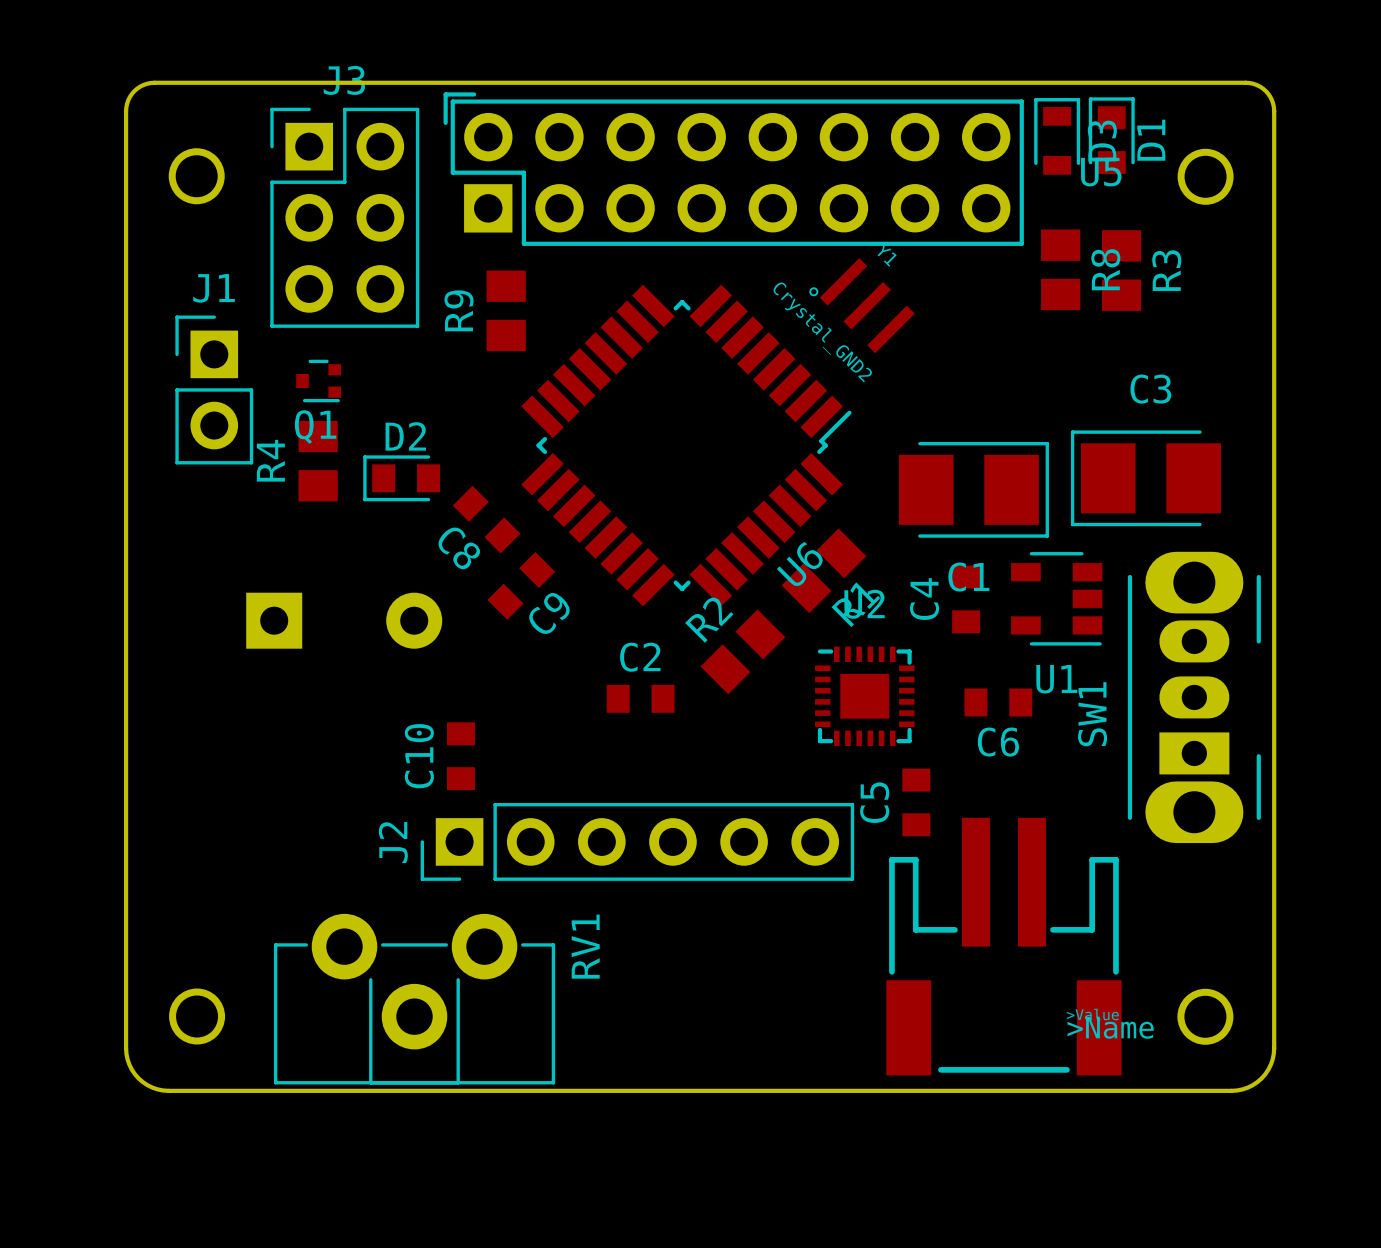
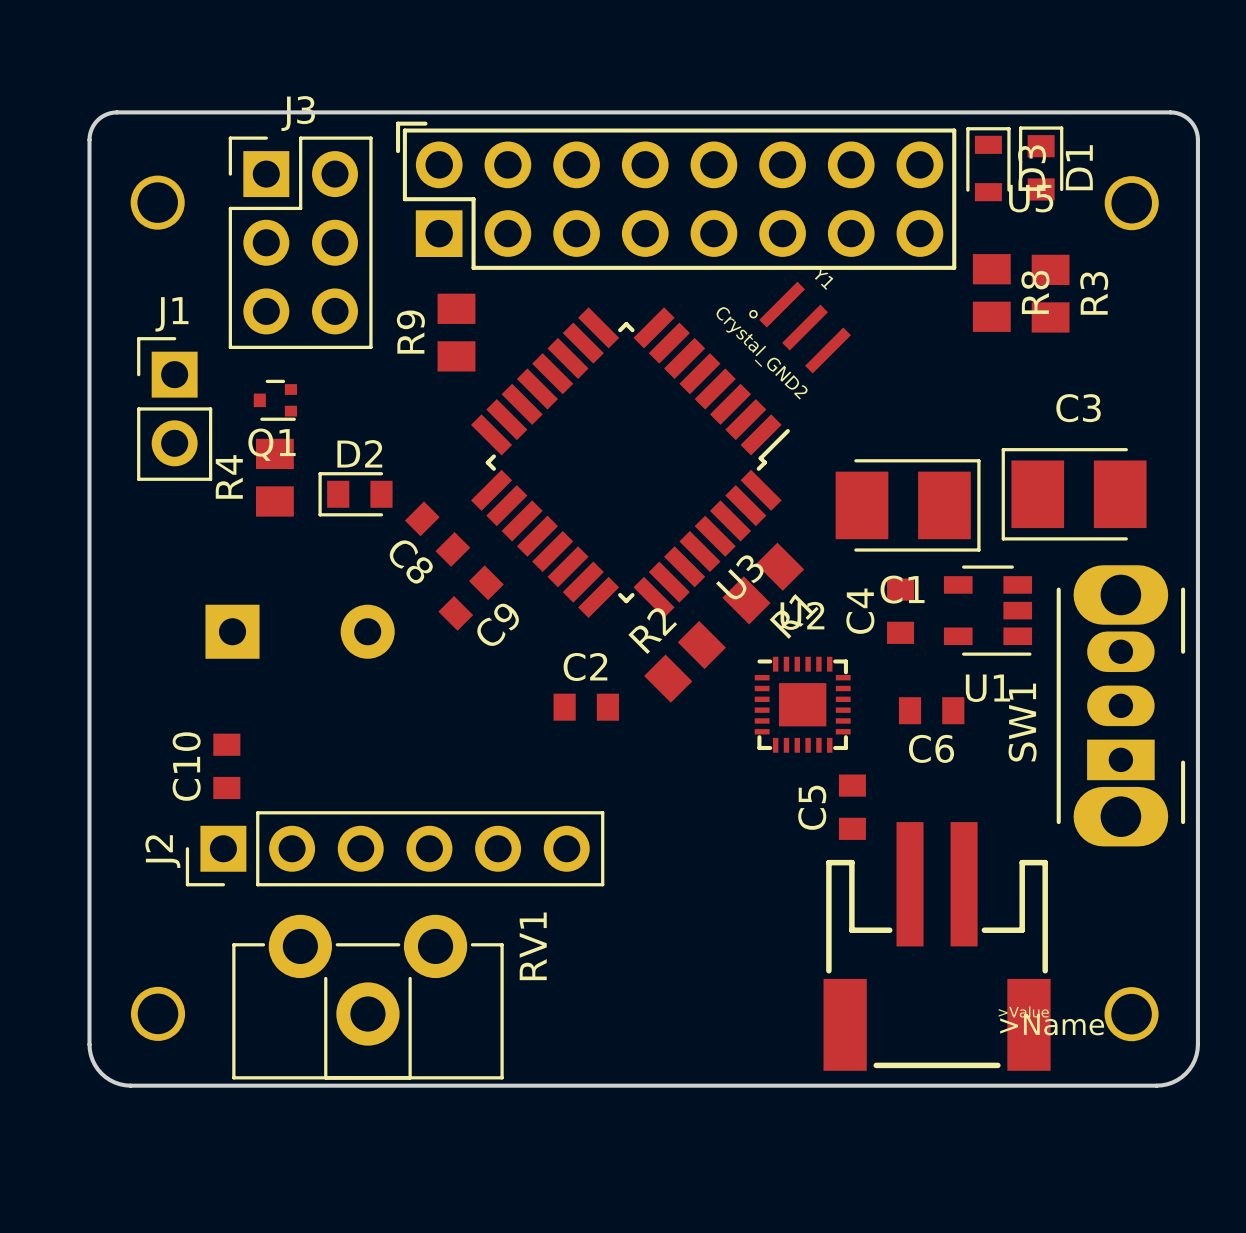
U6 name: U6 (799, 564) -> U3 (739, 577)
C10 position: (460, 756) -> (226, 766)
J2 position: (637, 841) -> (395, 848)

